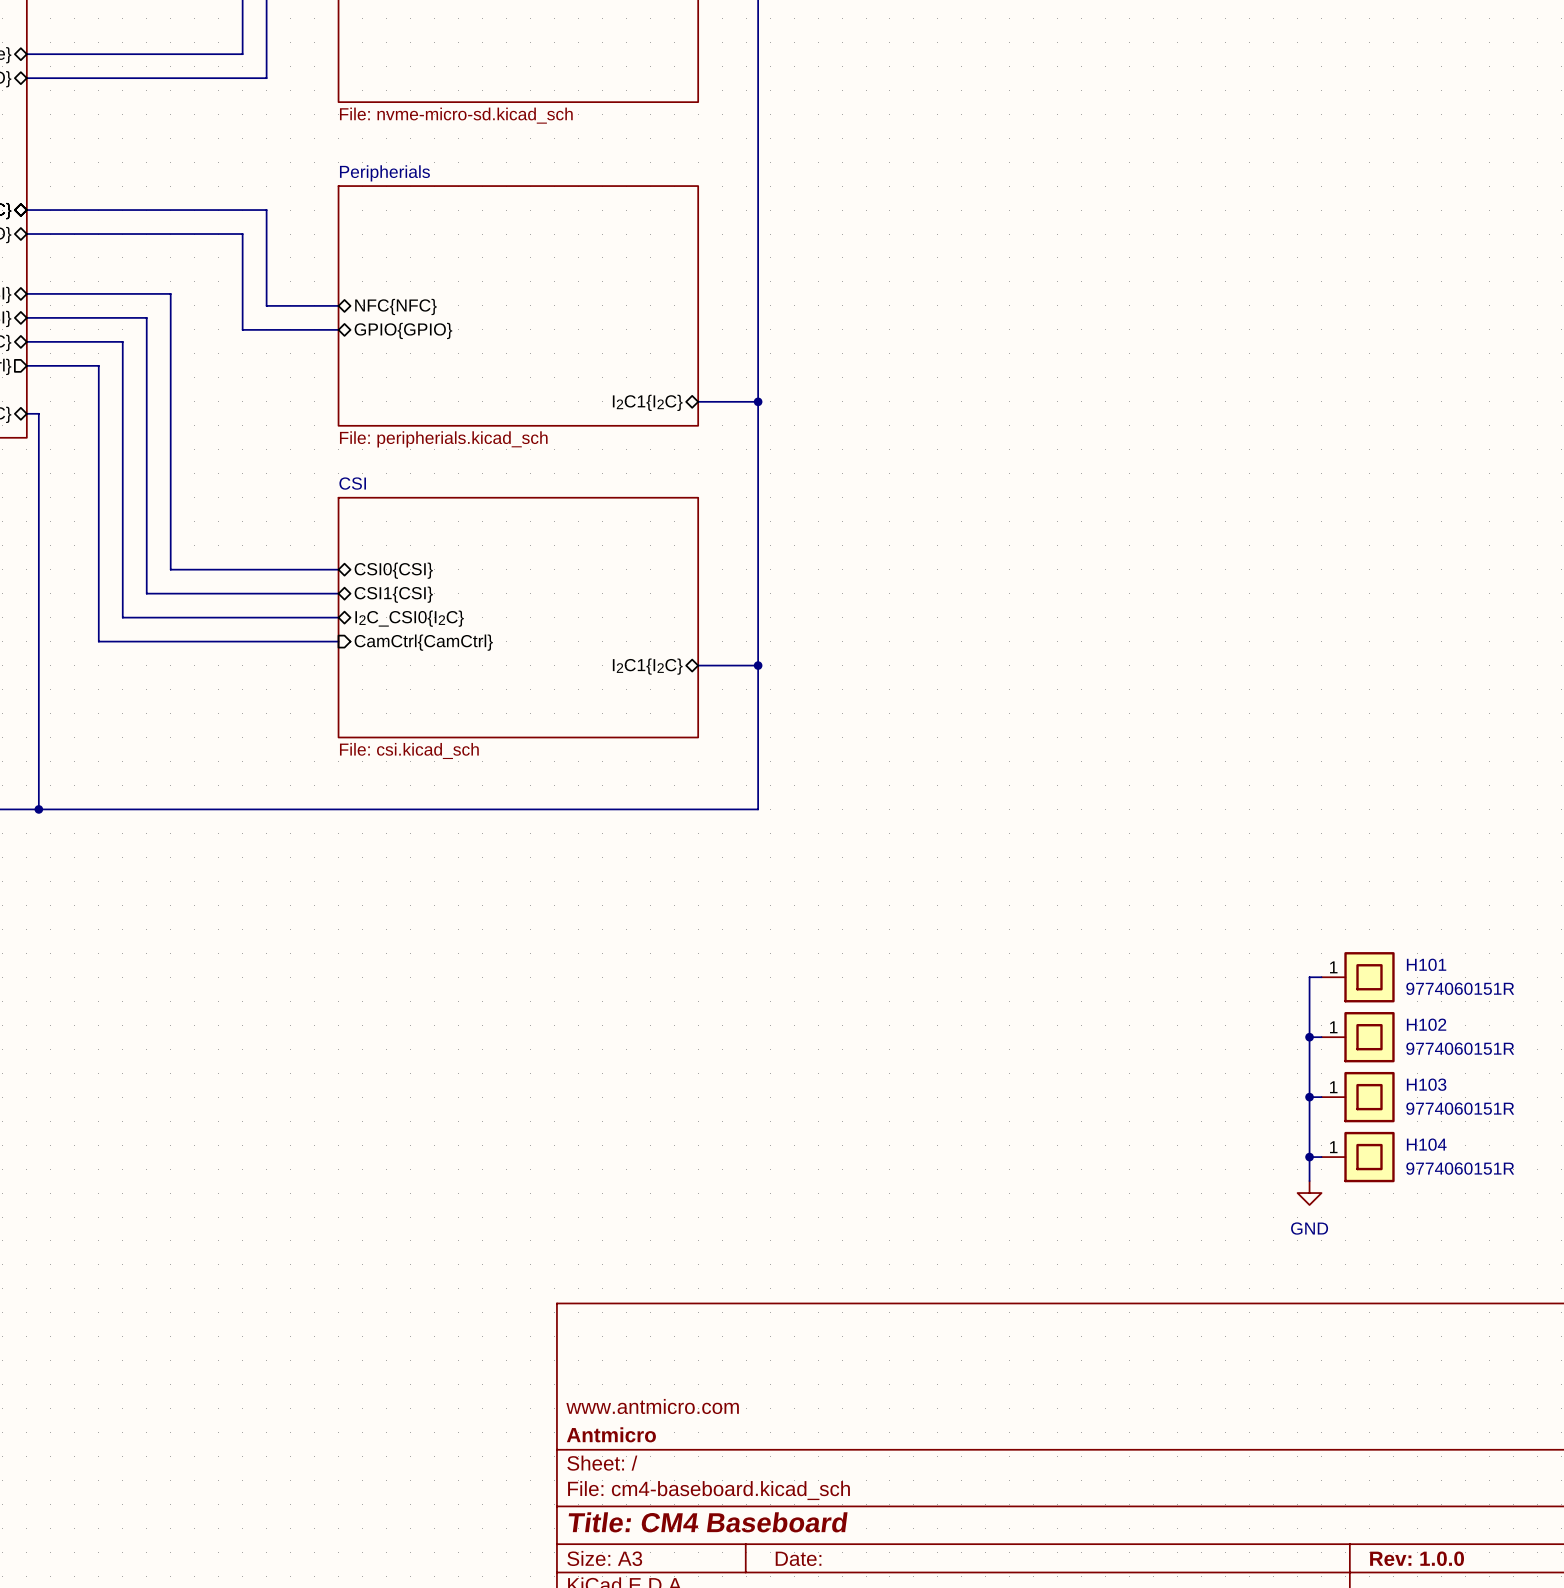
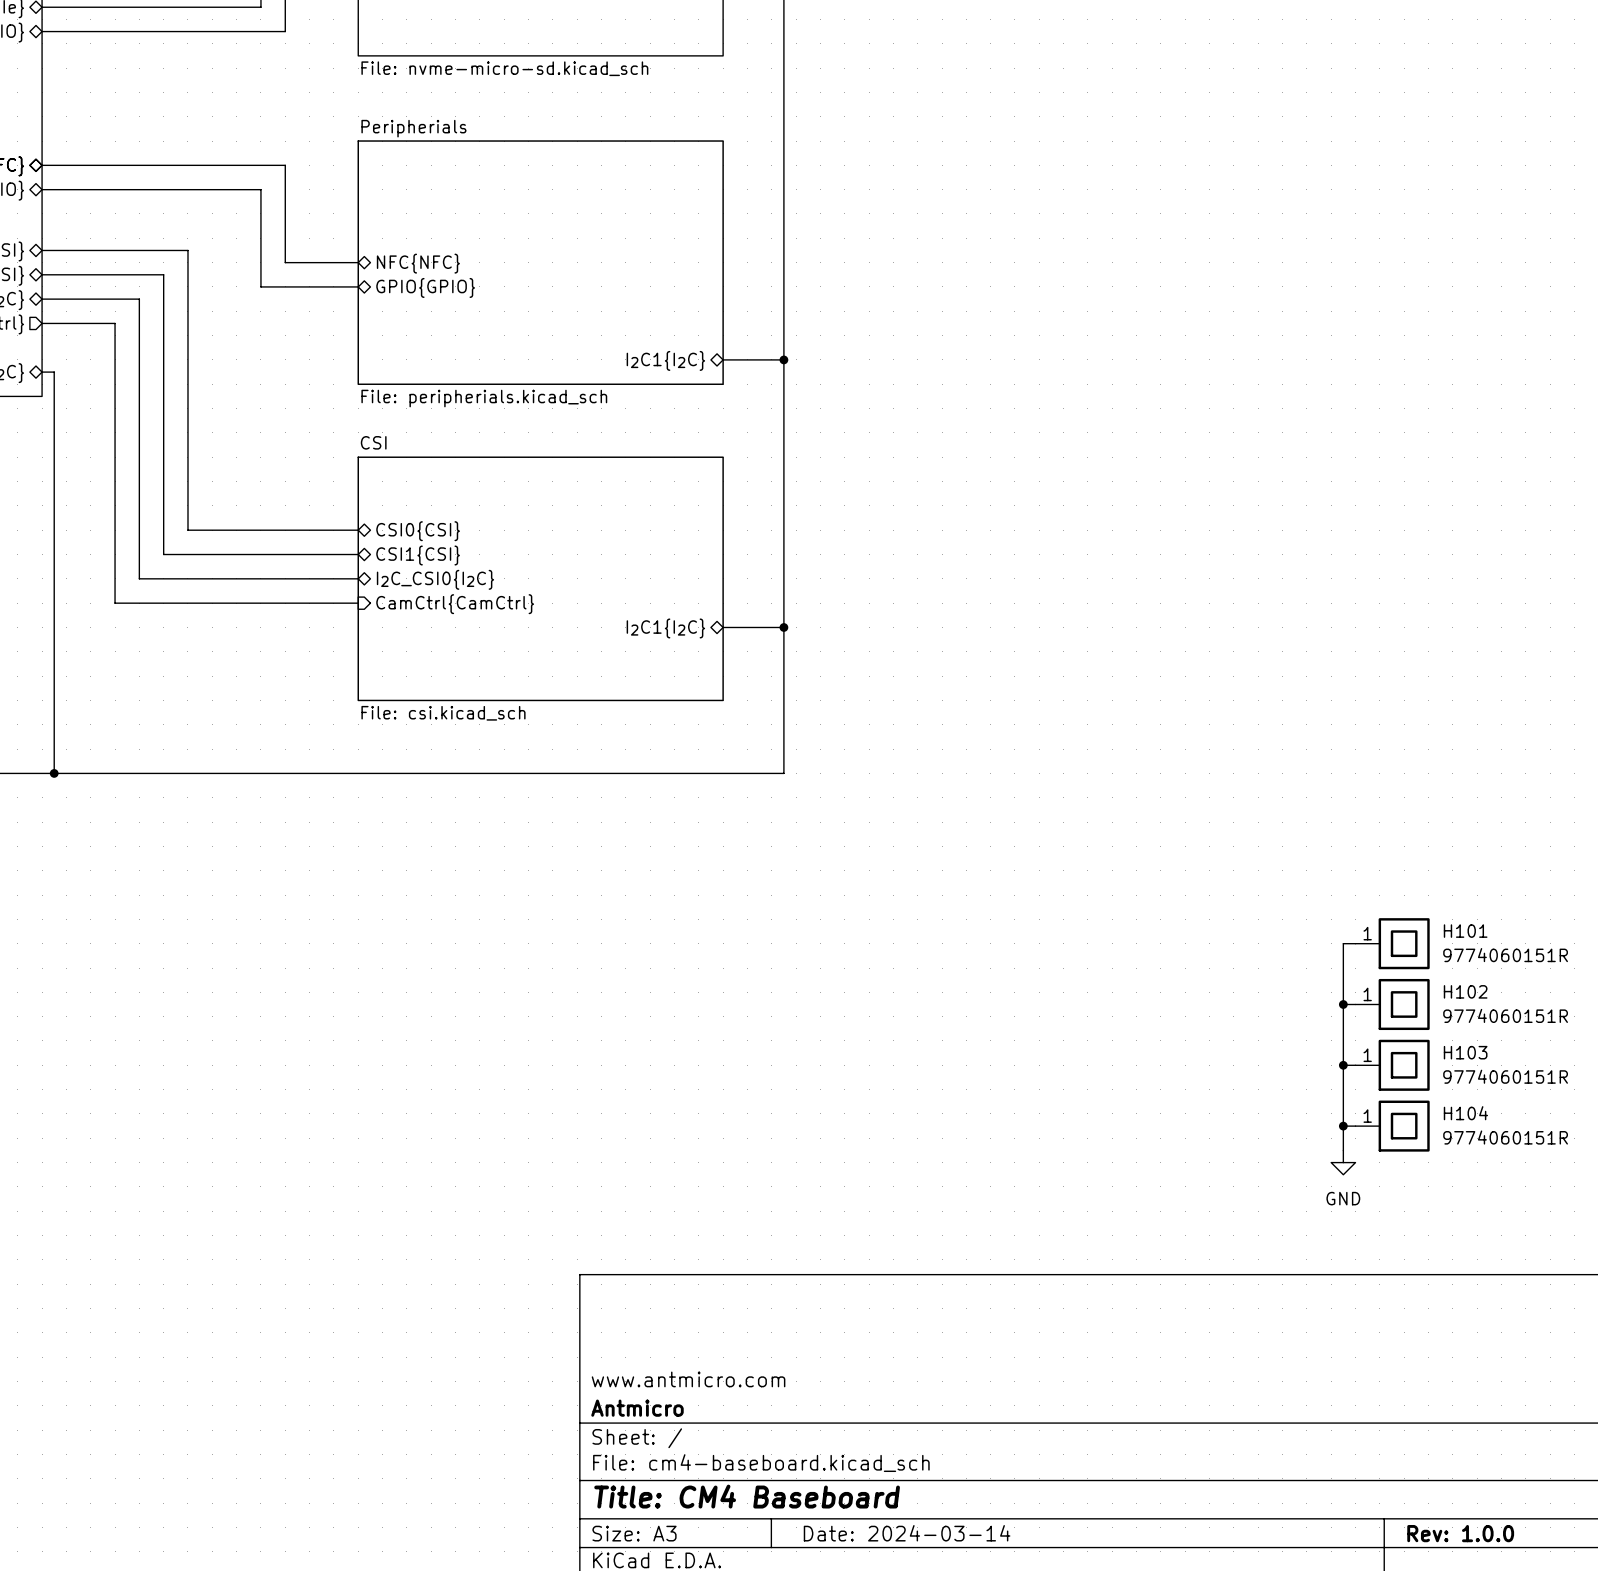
title block: Date: (798, 1558) -> Date: 2024-03-14 (907, 1533)

